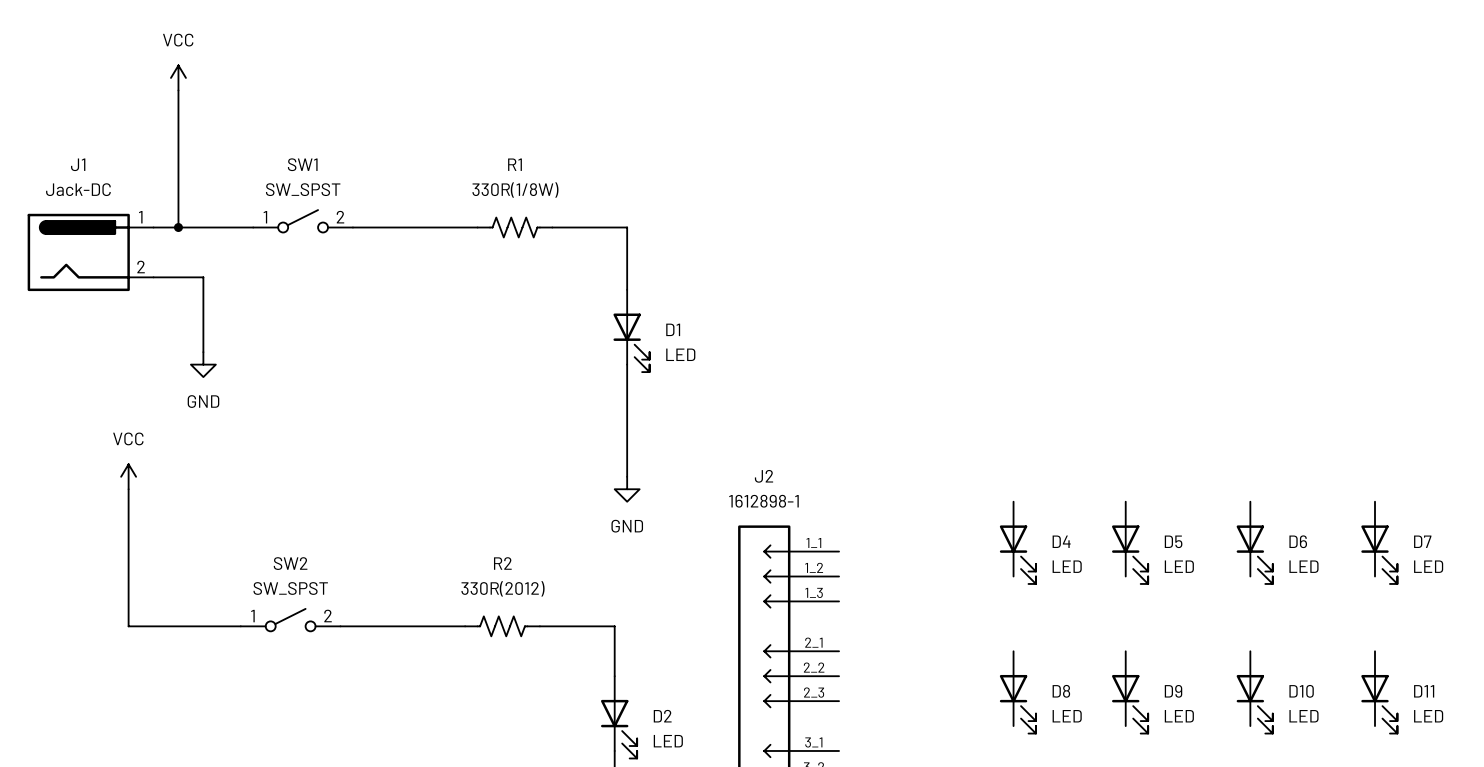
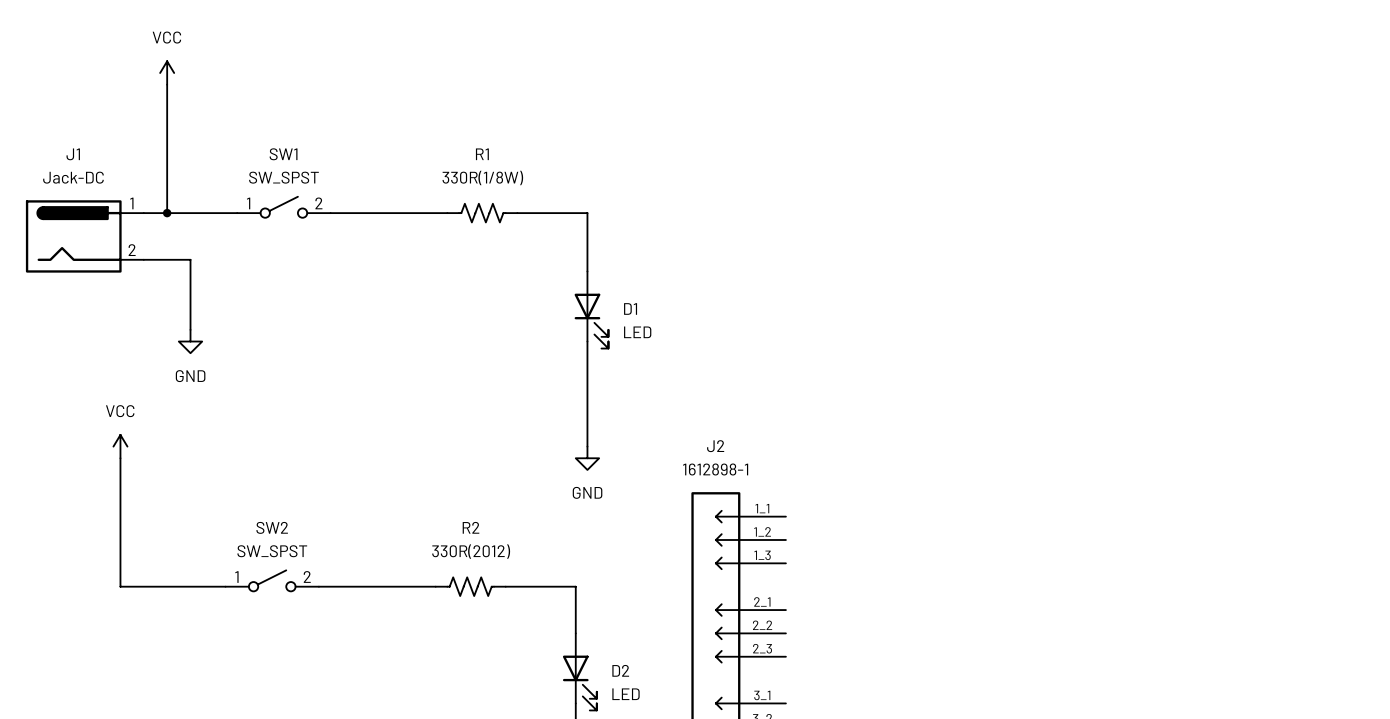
D4: LED (1017, 542) -> none
D5: LED (1130, 542) -> none
D6: LED (1254, 542) -> none
D7: LED (1379, 542) -> none
D8: LED (1017, 692) -> none
D9: LED (1130, 692) -> none
D10: LED (1254, 692) -> none
D11: LED (1379, 692) -> none

